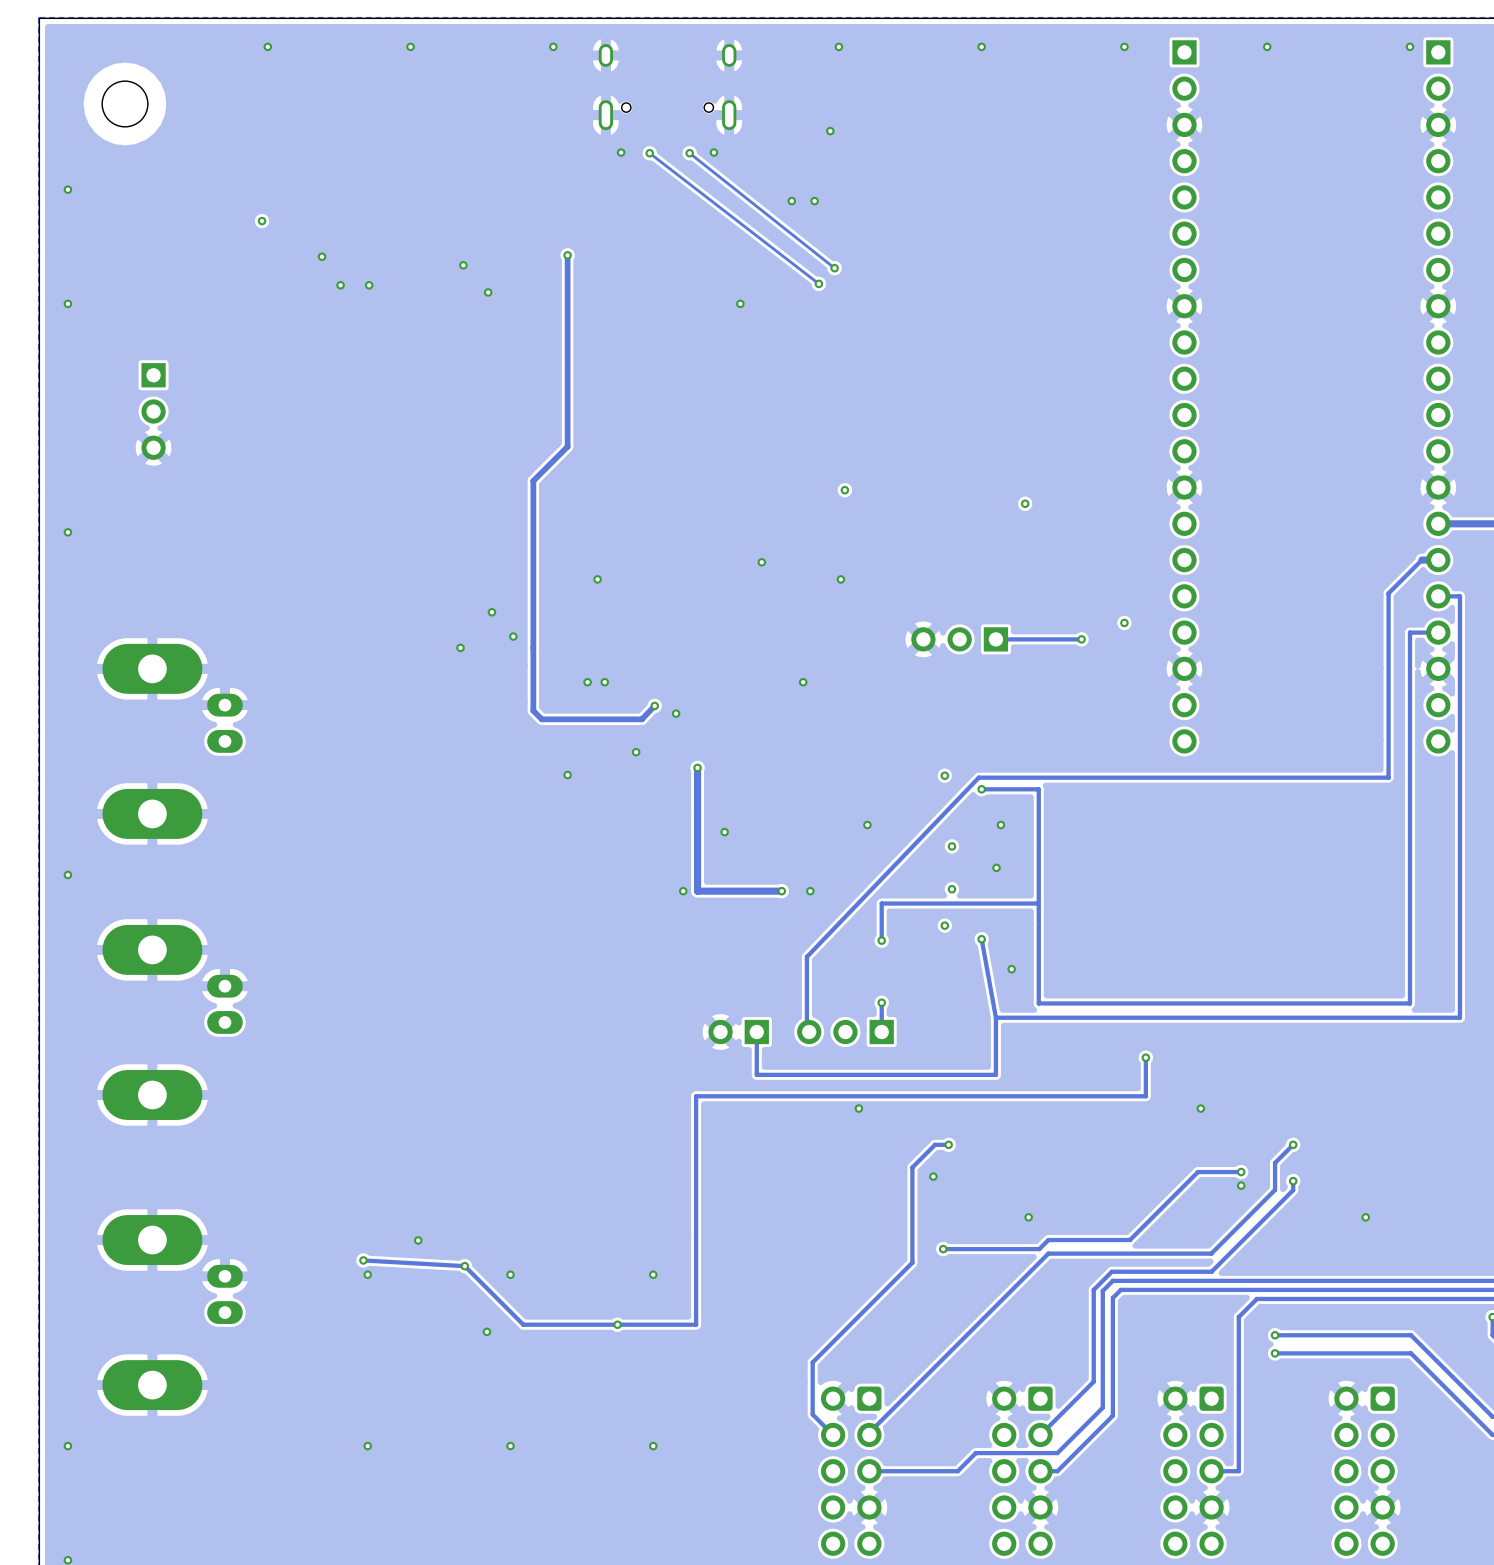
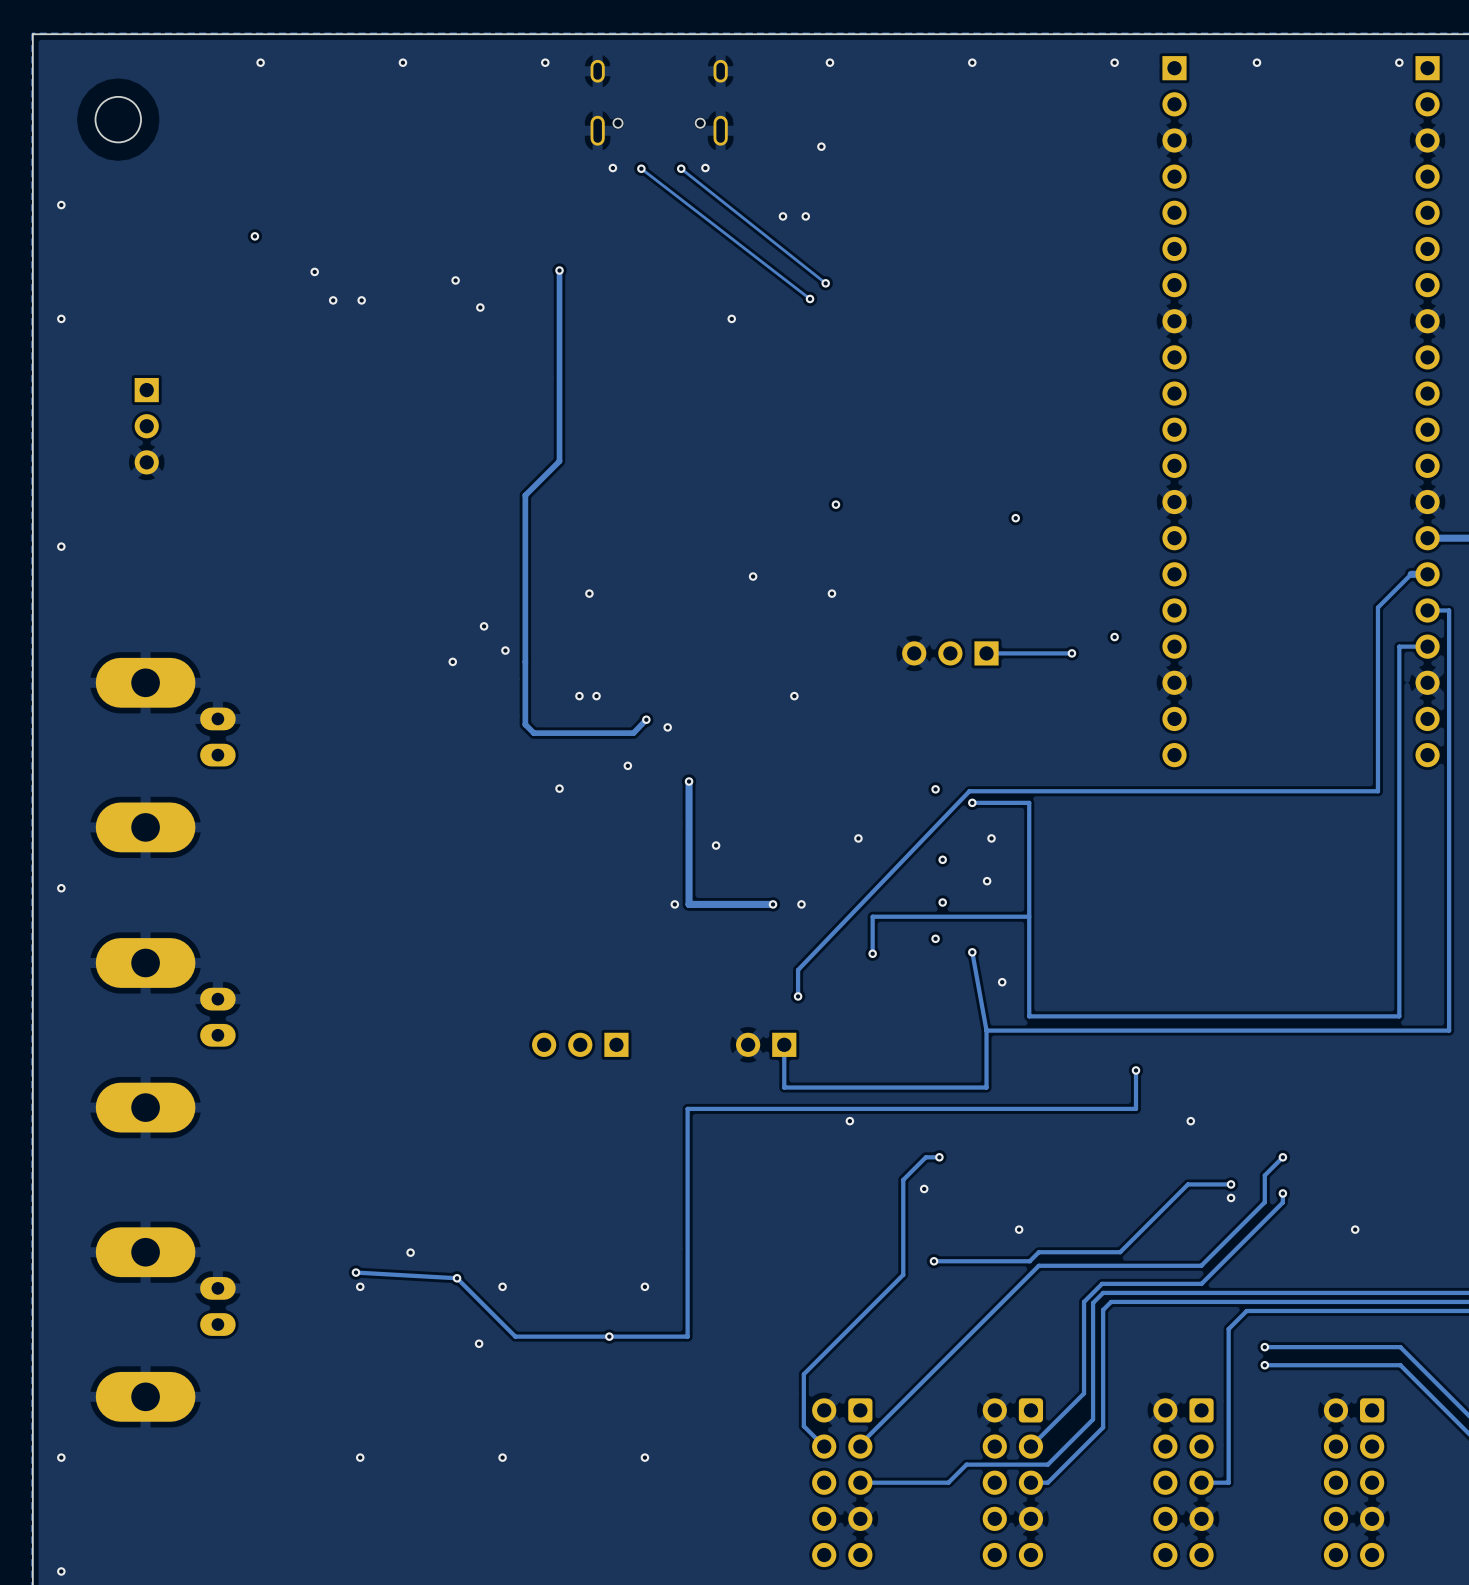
track: (806, 983) (806, 1029) (809, 1032) -> none
track: (881, 1002) (881, 1032) -> none
via position: (881, 1002) -> (798, 996)
part position: (738, 1032) -> (766, 1044)
track: (756, 1032) (756, 1074) (793, 1074) -> (784, 1044) (784, 1087)
part position: (845, 1032) -> (580, 1044)

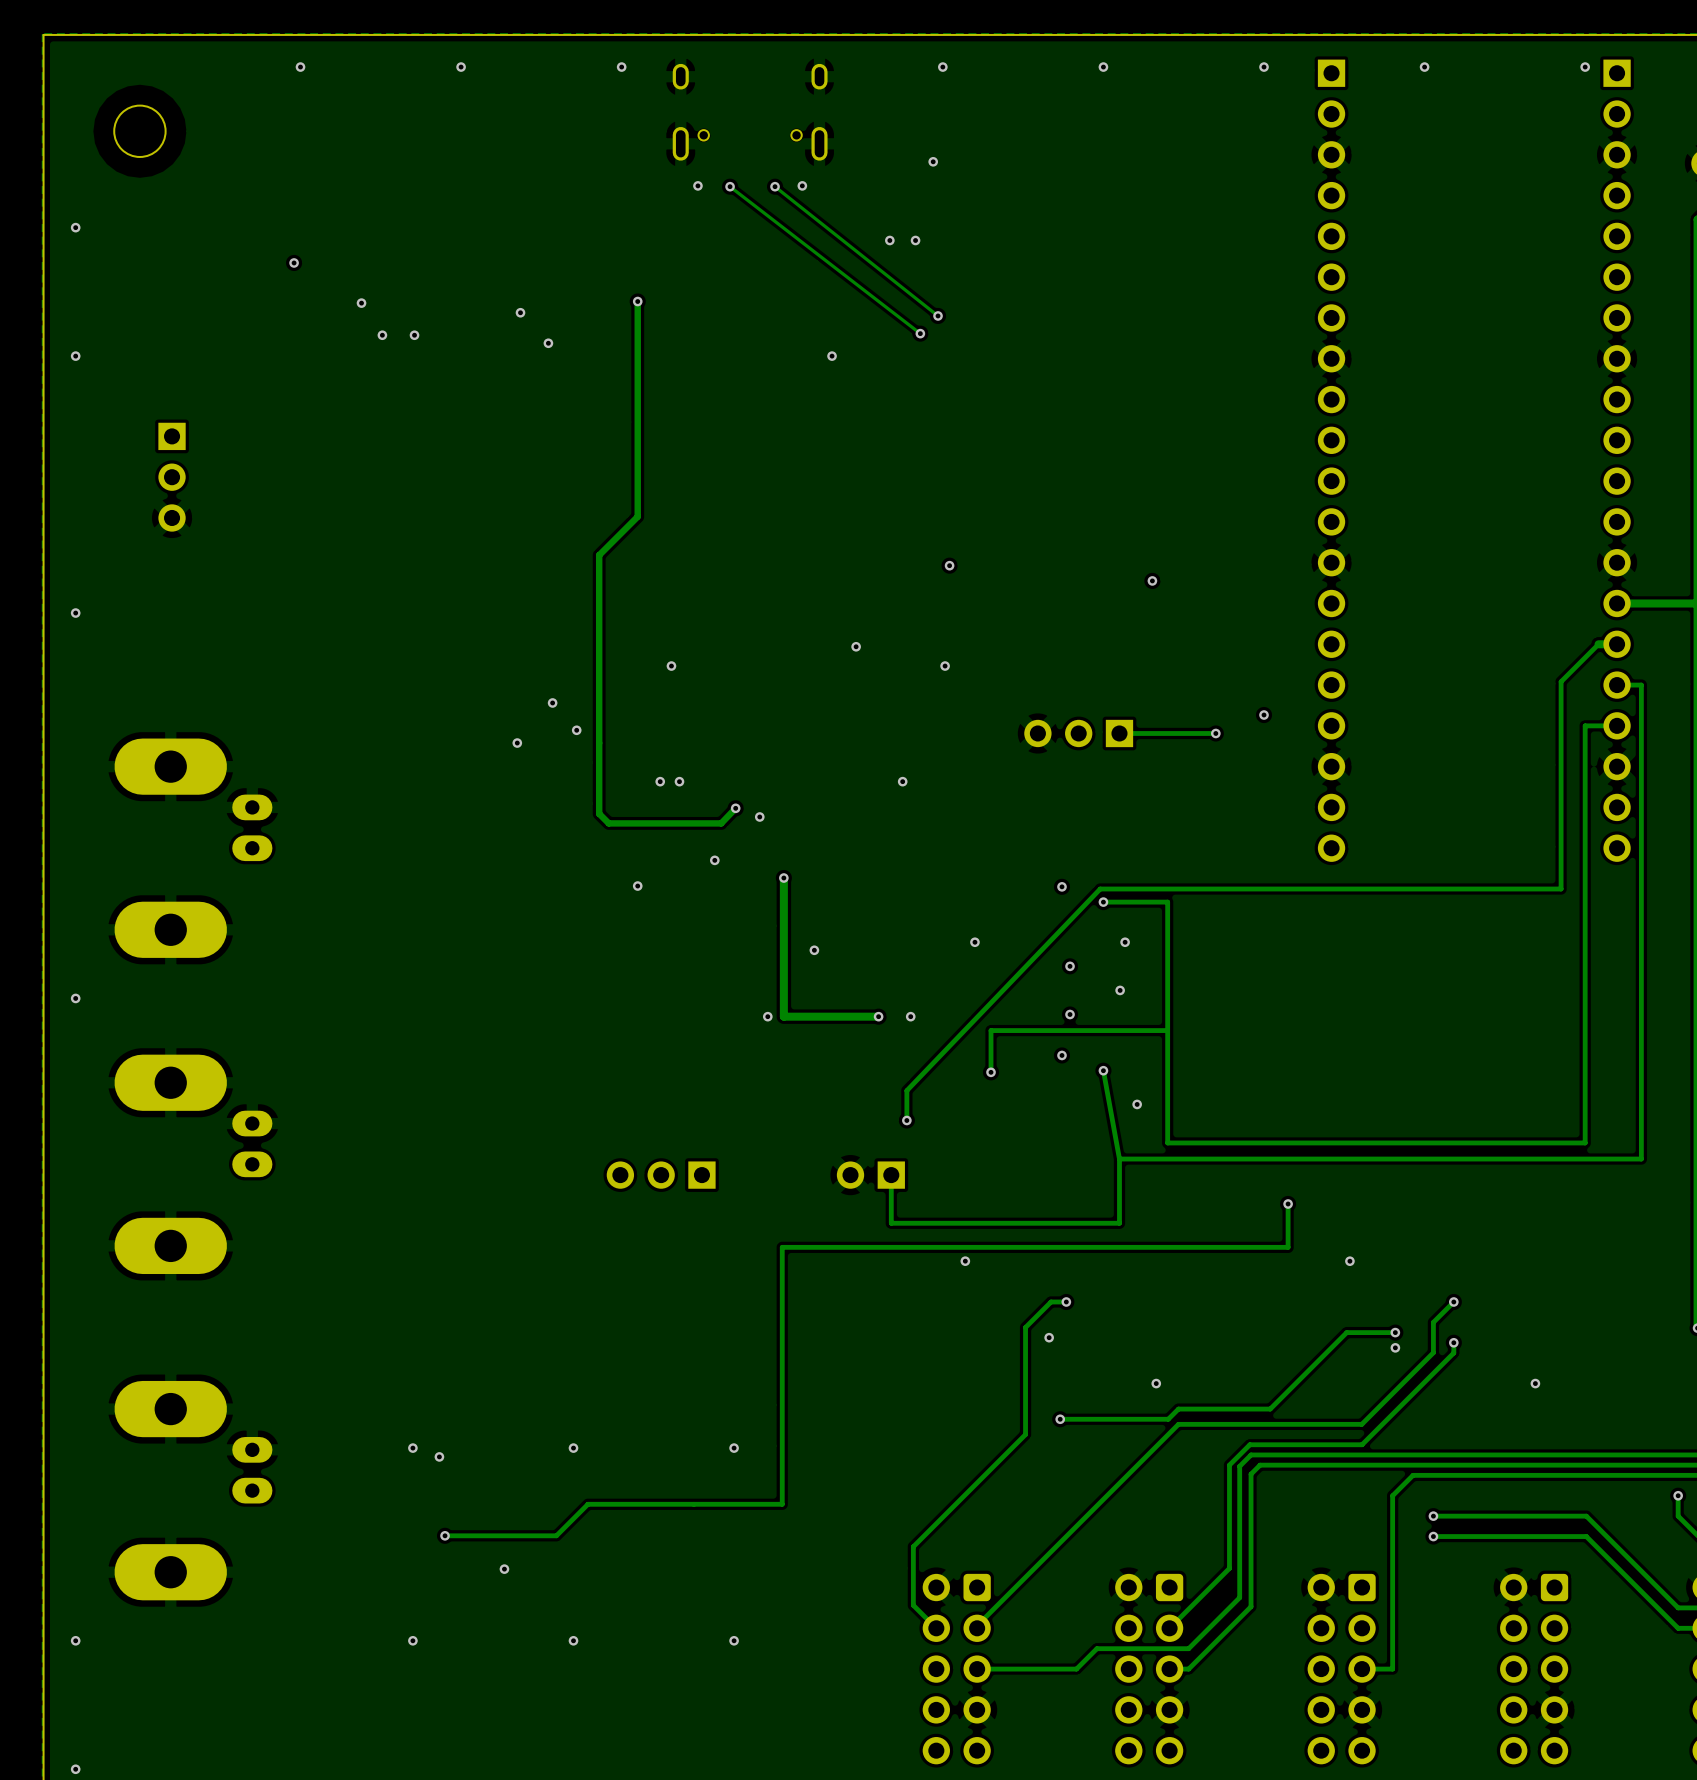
via: (410, 1252) -> none
track: (355, 1272) (457, 1278) (515, 1336) -> (445, 1535) (556, 1535) (587, 1504)
via: (355, 1272) -> none
via: (457, 1278) -> none
via: none -> (439, 1456)
via: (609, 1336) -> none
via: (479, 1343) -> none
via: none -> (445, 1535)
via: none -> (504, 1569)

